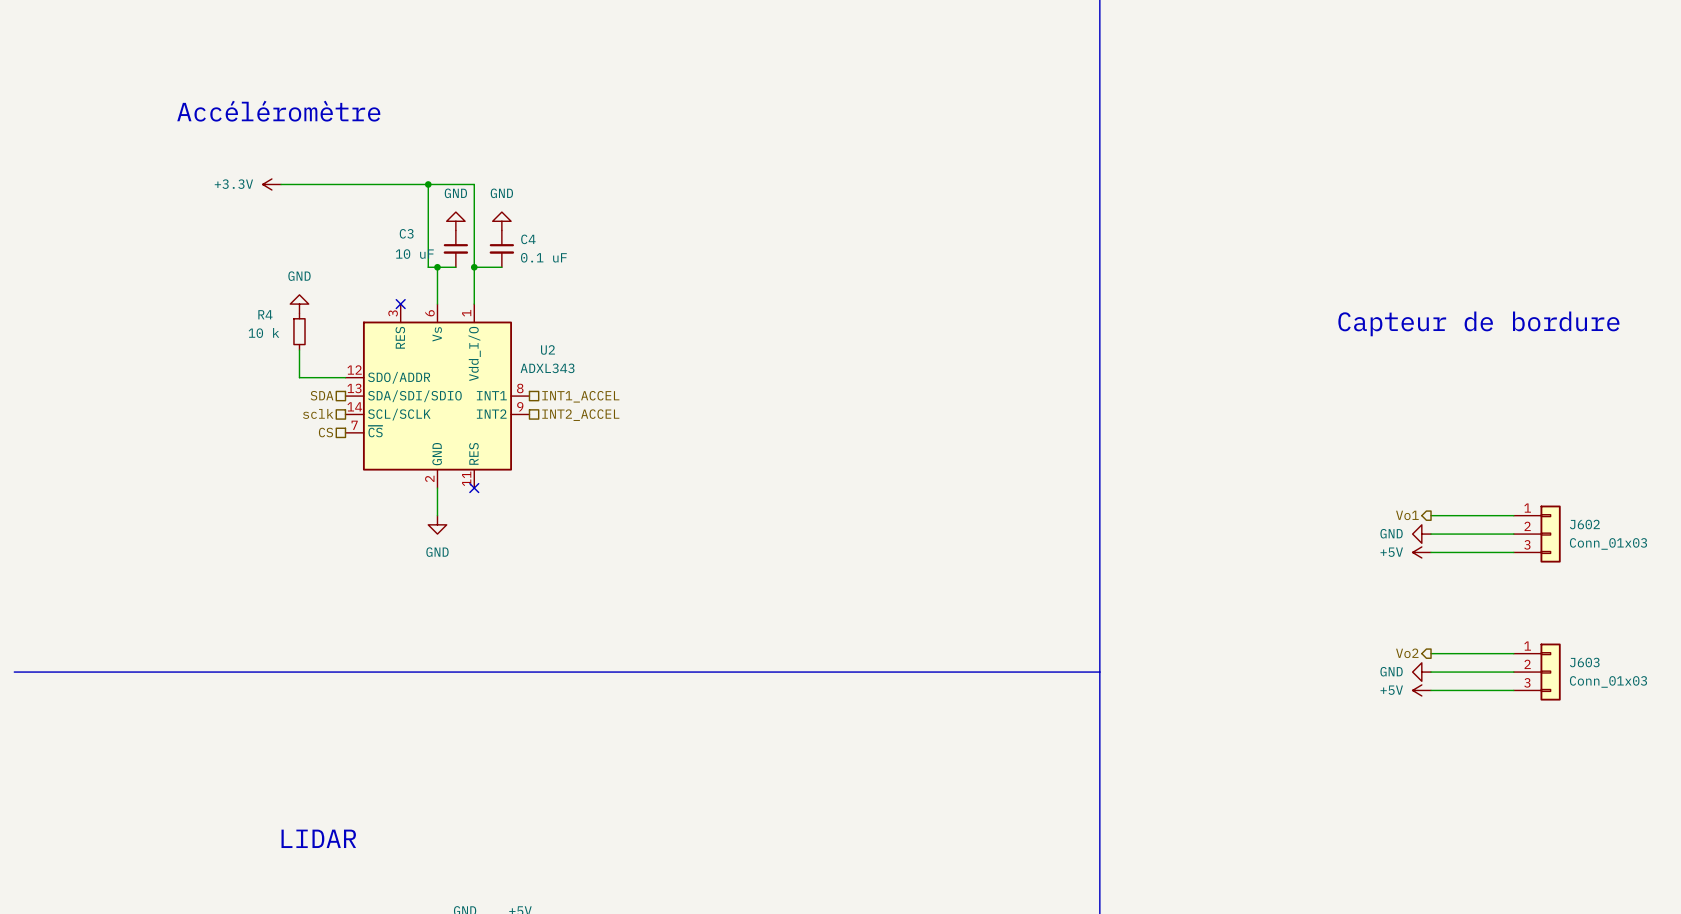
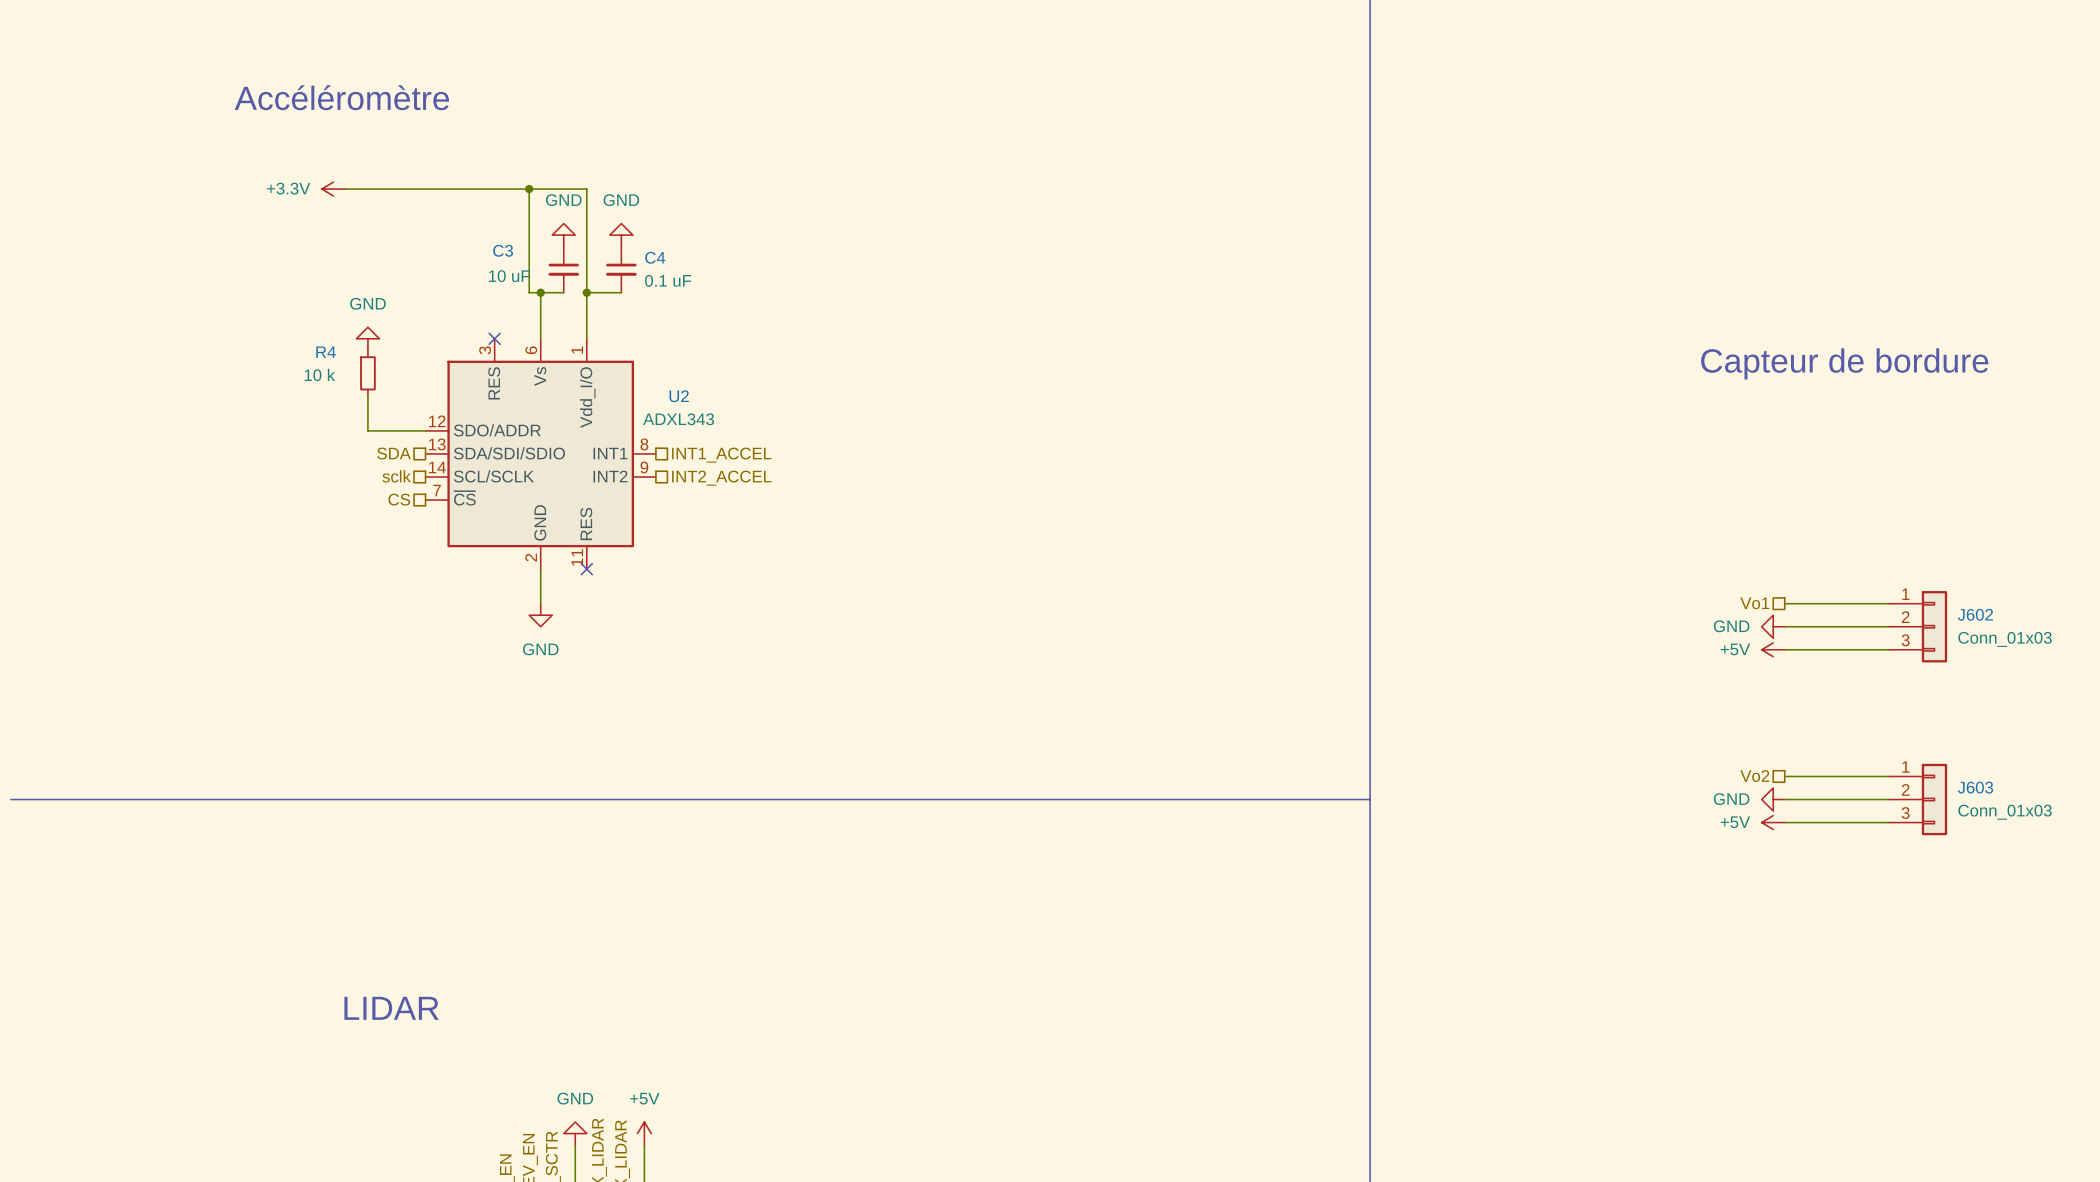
hierarchical label shape: output (1407, 515) -> passive (1754, 603)
hierarchical label shape: output (1407, 653) -> passive (1754, 776)

